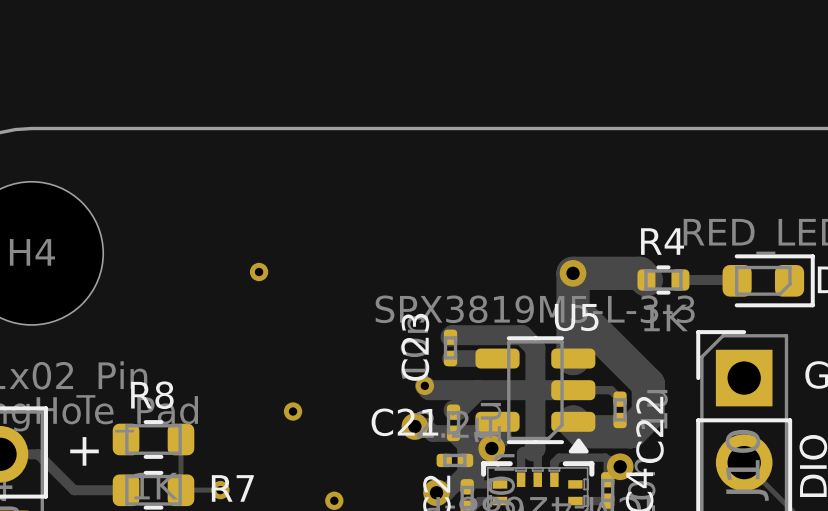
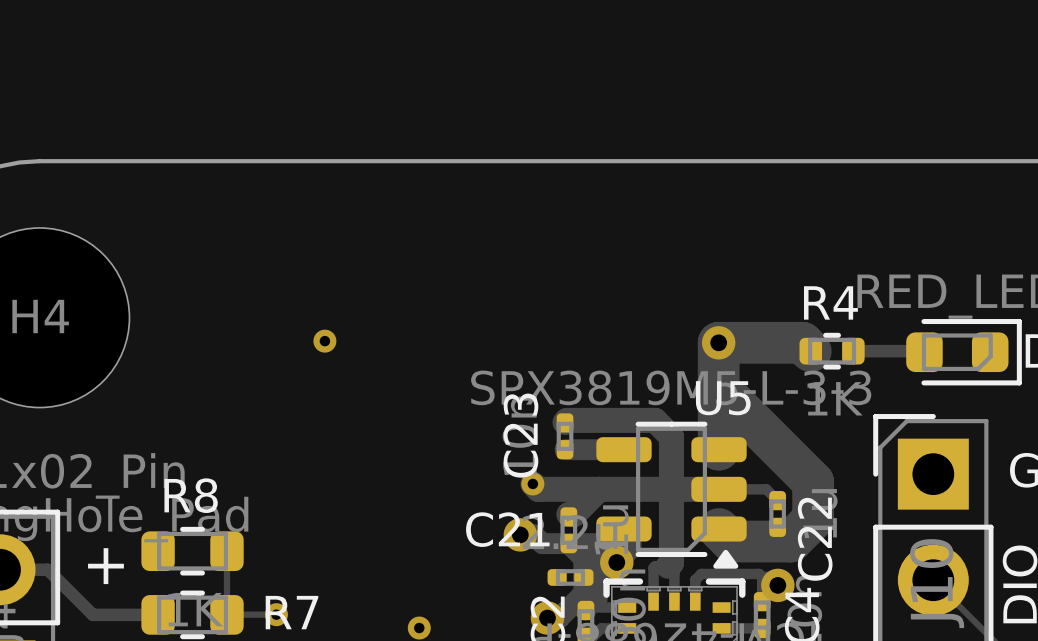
via: (293, 411) -> none

